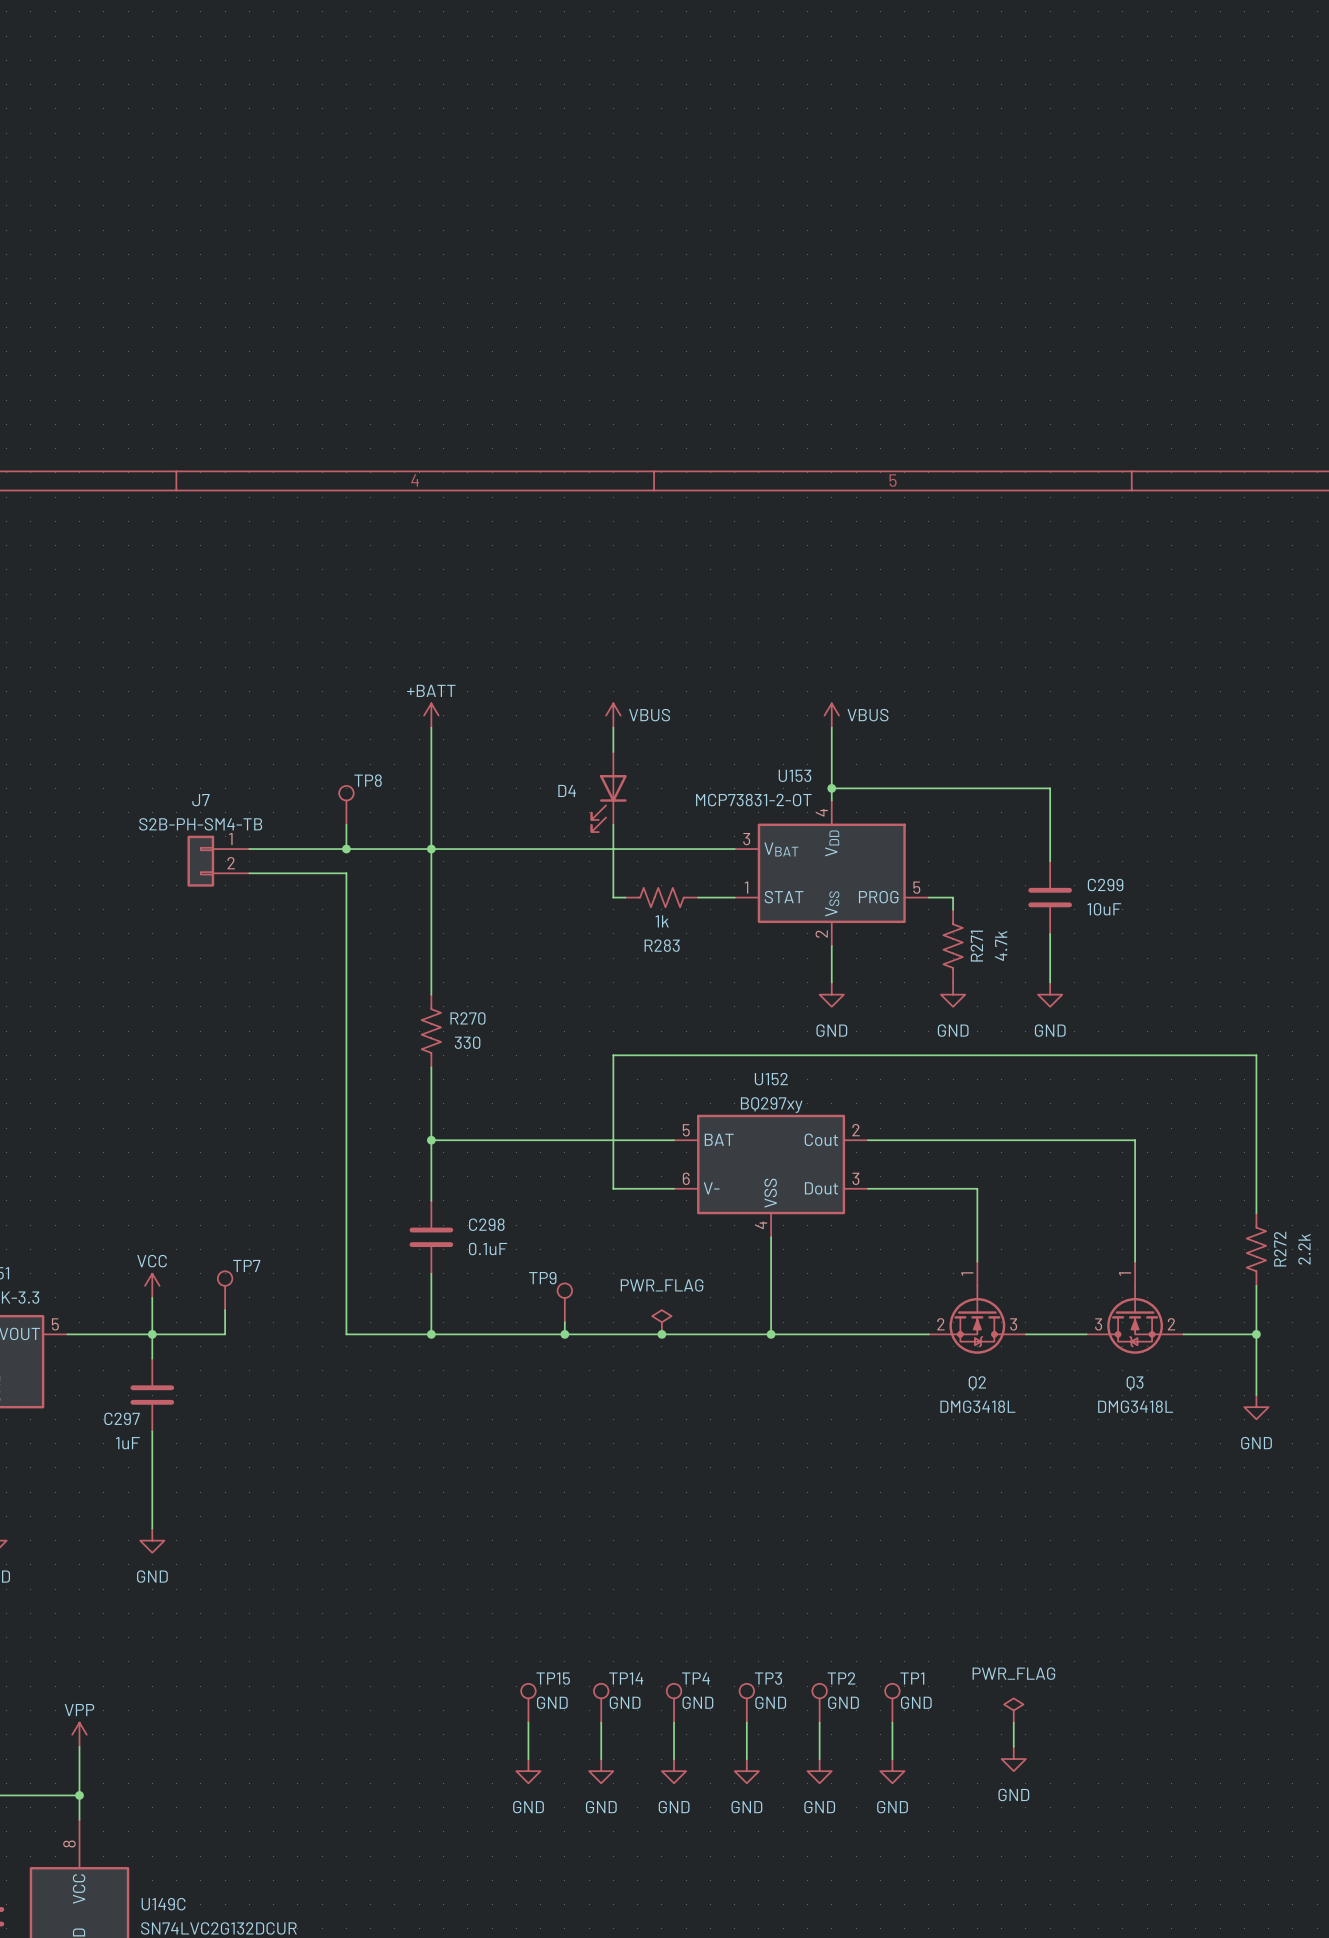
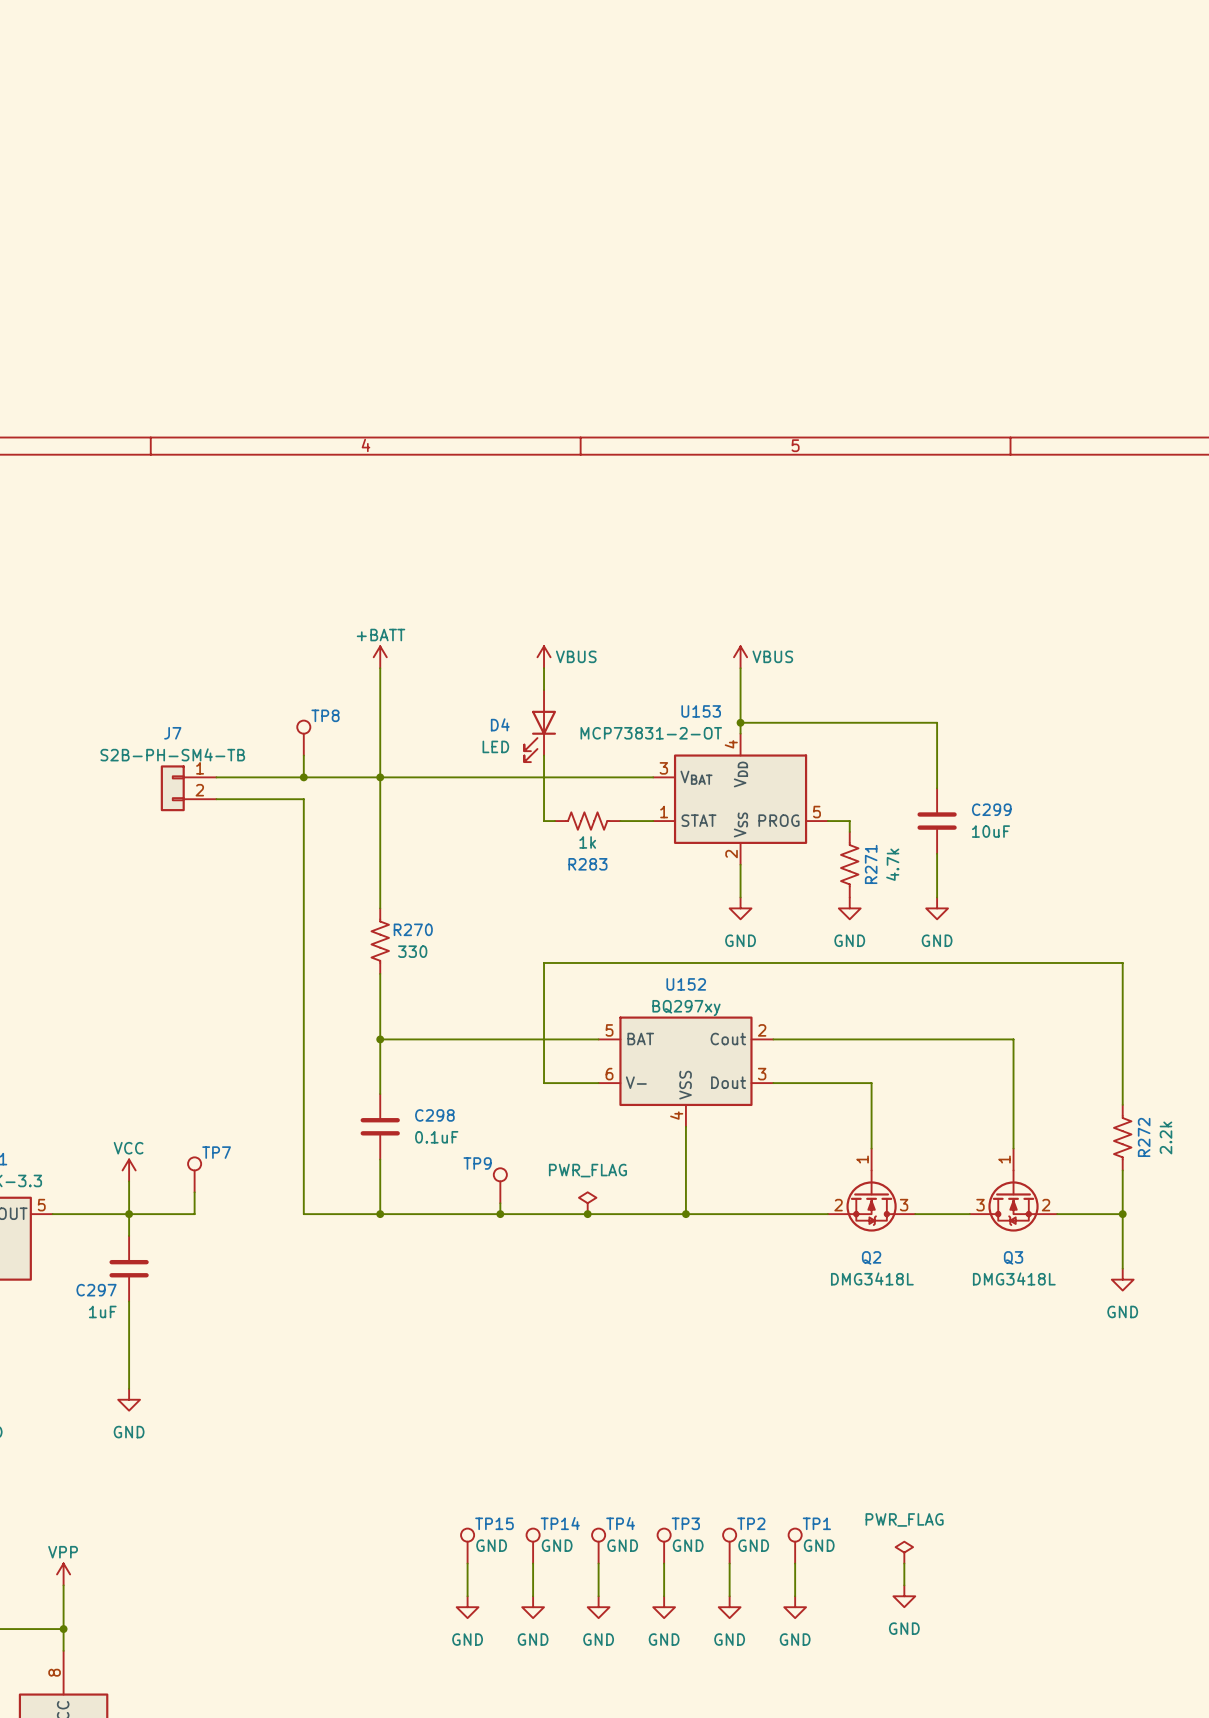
D4 value: none -> LED (495, 746)

